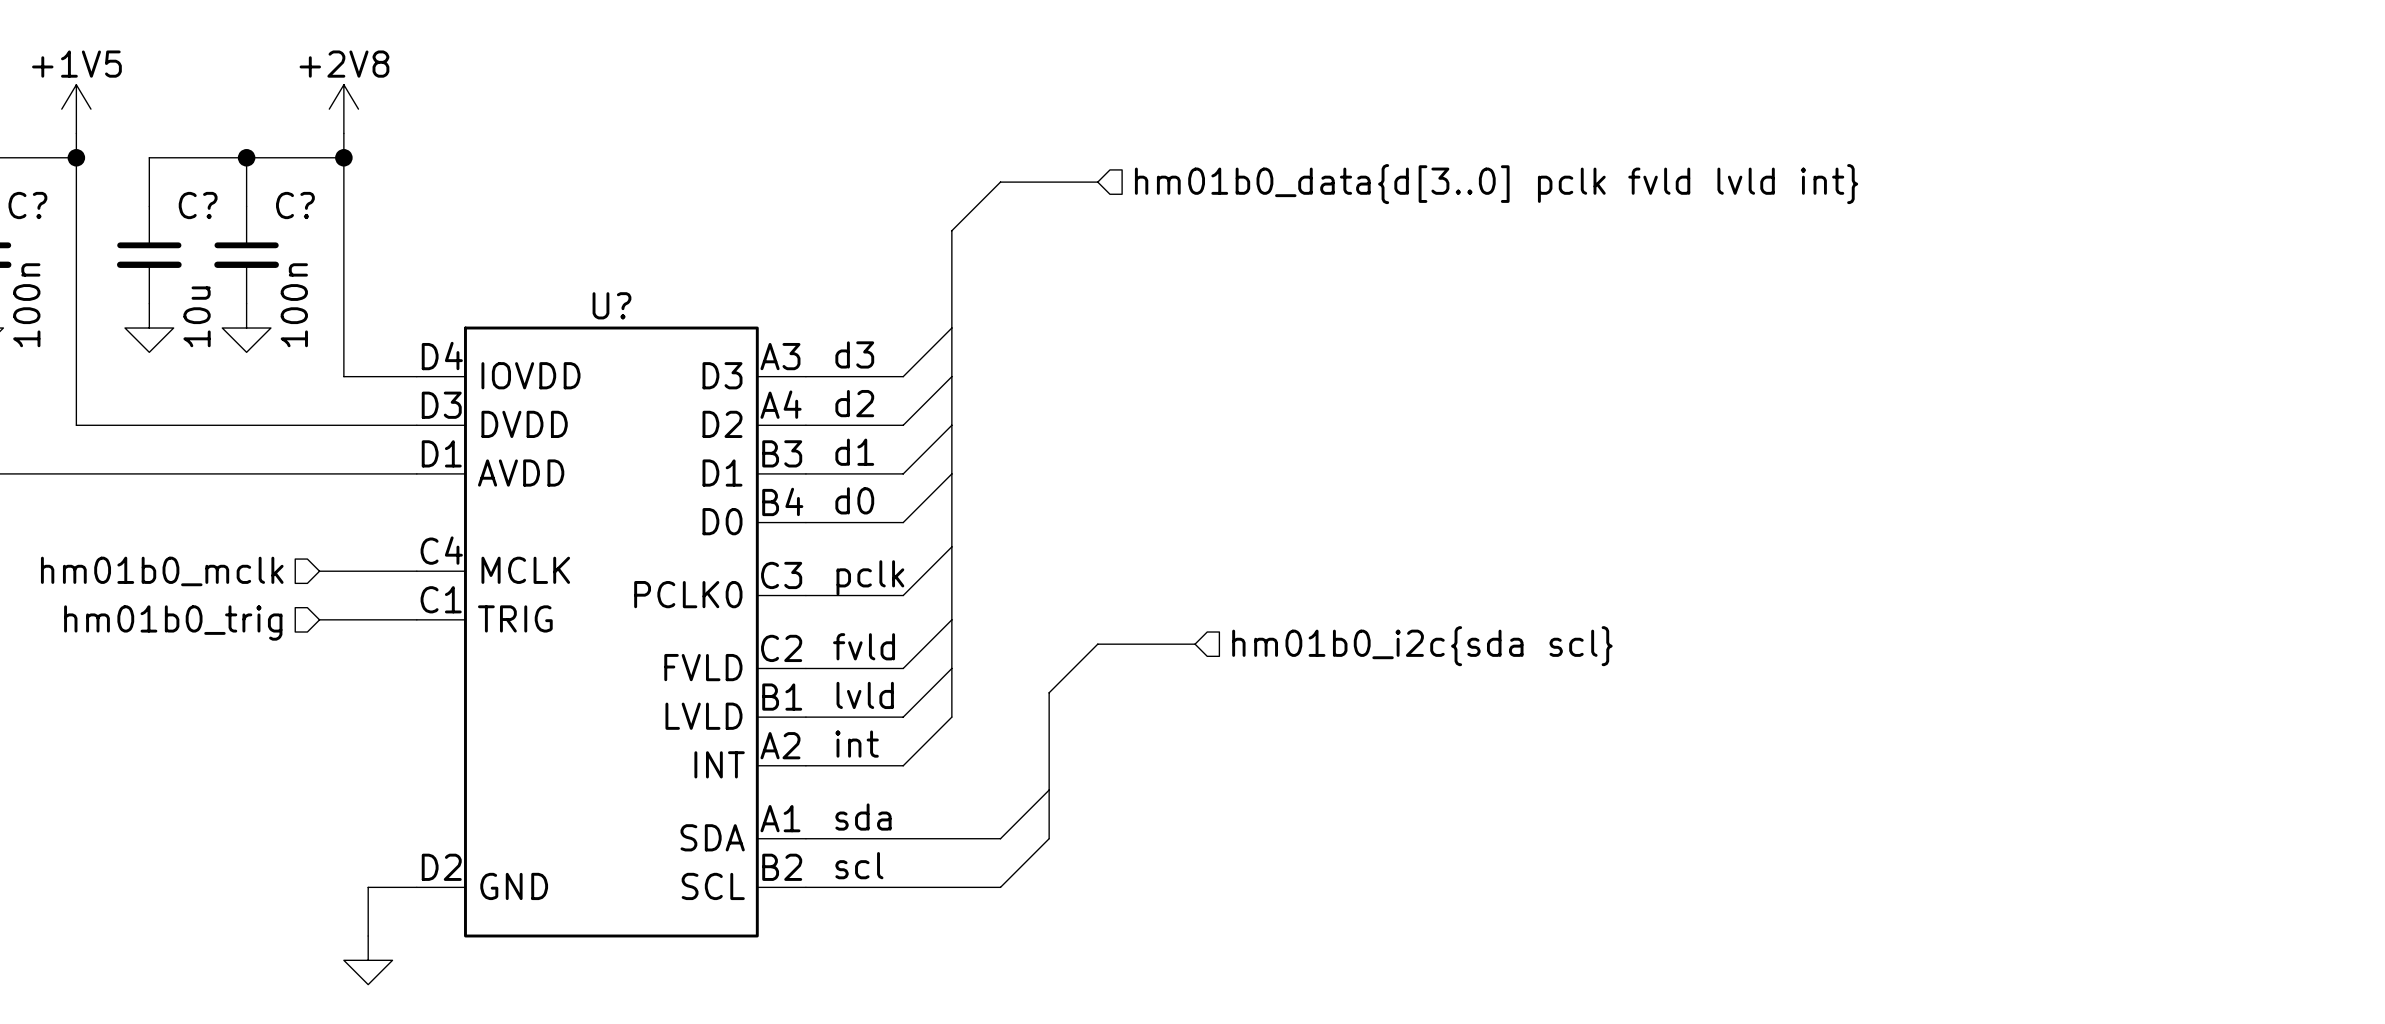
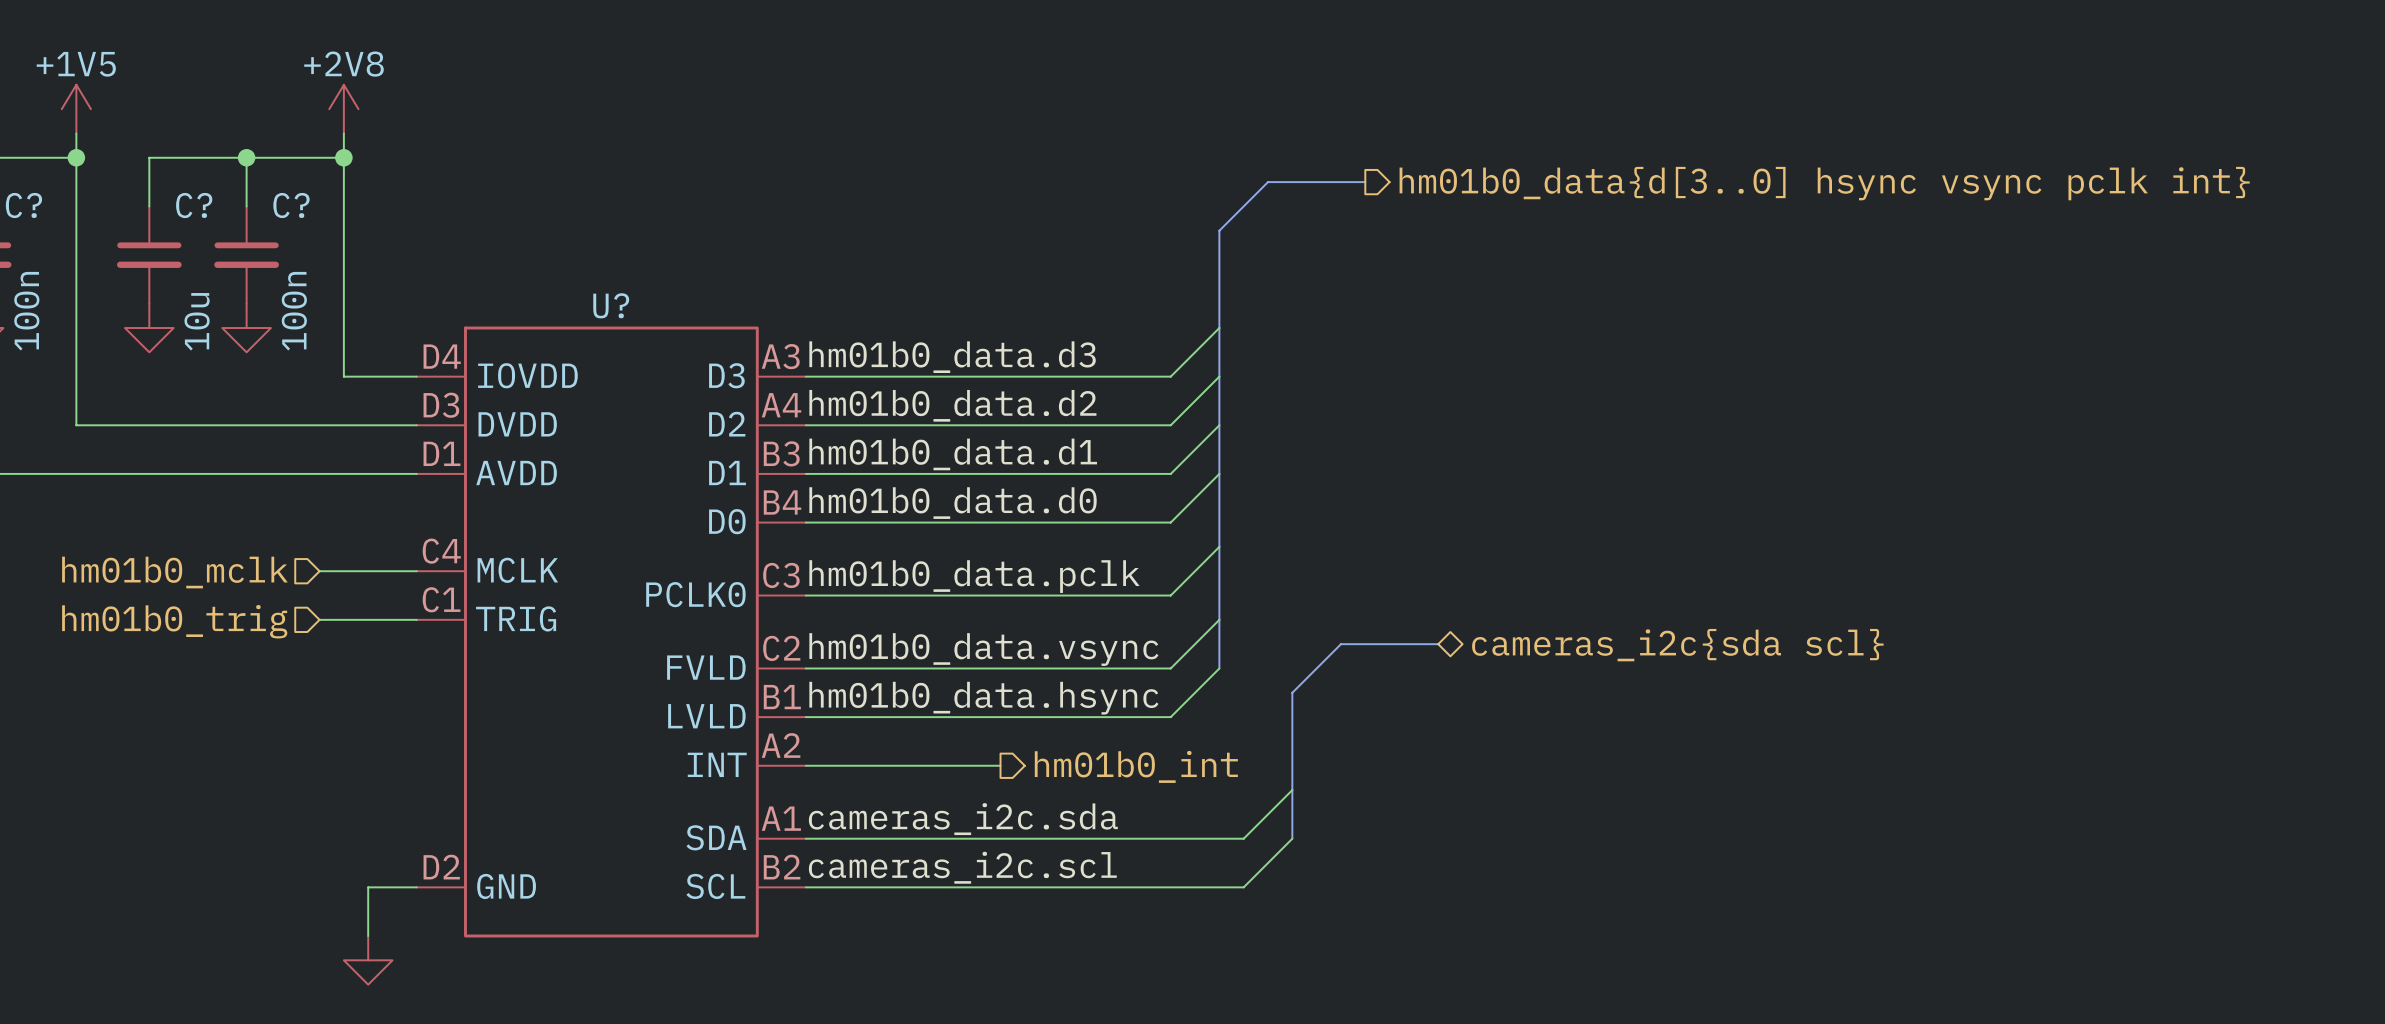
bus: (1097, 182) (1000, 182) (951, 230) (951, 717) -> none
bus: none -> (1365, 182) (1268, 182) (1219, 230) (1219, 668)
hierarchical label shape: input (1496, 184) -> output (1824, 183)
hierarchical label: hm01b0_data{d[3..0] pclk fvld lvld int} (1496, 184) -> hm01b0_data{d[3..0] hsync vsync pclk int} (1824, 183)
wire: (951, 328) (903, 376) -> (1219, 328) (1170, 376) (903, 376)
label: d3 (854, 354) -> none
label: none -> hm01b0_data.d3 (952, 357)
wire: (951, 376) (903, 425) -> (1219, 376) (1170, 425) (903, 425)
label: d2 (854, 403) -> none
label: none -> hm01b0_data.d2 (952, 405)
wire: (951, 425) (903, 473) -> (1219, 425) (1170, 473) (903, 473)
label: d1 (854, 452) -> none
label: none -> hm01b0_data.d1 (953, 454)
wire: (951, 473) (903, 522) -> (1219, 473) (1170, 522) (903, 522)
label: d0 (854, 500) -> none
label: none -> hm01b0_data.d0 (953, 503)
wire: (951, 546) (903, 595) -> (1219, 546) (1170, 595) (903, 595)
label: pclk (870, 577) -> none
label: none -> hm01b0_data.pclk (974, 576)
wire: (951, 619) (903, 668) -> (1219, 619) (1170, 668) (903, 668)
bus: (1195, 644) (1097, 644) (1049, 692) (1049, 838) -> (1438, 644) (1340, 644) (1292, 692) (1292, 838)
label: fvld (864, 646) -> none
hierarchical label shape: input (1422, 646) -> bidirectional (1677, 645)
hierarchical label: hm01b0_i2c{sda scl} (1422, 646) -> cameras_i2c{sda scl} (1677, 645)
label: none -> hm01b0_data.vsync (983, 649)
wire: (951, 668) (903, 717) -> (1219, 668) (1170, 717) (903, 717)
label: lvld (865, 695) -> none
label: none -> hm01b0_data.hsync (983, 698)
wire: (951, 717) (903, 765) -> (1000, 765) (903, 765)
label: int (857, 744) -> none
hierarchical label: none -> hm01b0_int (1136, 766)
wire: (1049, 790) (1000, 838) -> (1292, 790) (1243, 838) (1000, 838)
label: sda (863, 817) -> none
label: none -> cameras_i2c.sda (963, 819)
wire: (1049, 838) (1000, 887) -> (1292, 838) (1243, 887) (1000, 887)
label: scl (859, 865) -> none
label: none -> cameras_i2c.scl (962, 867)

